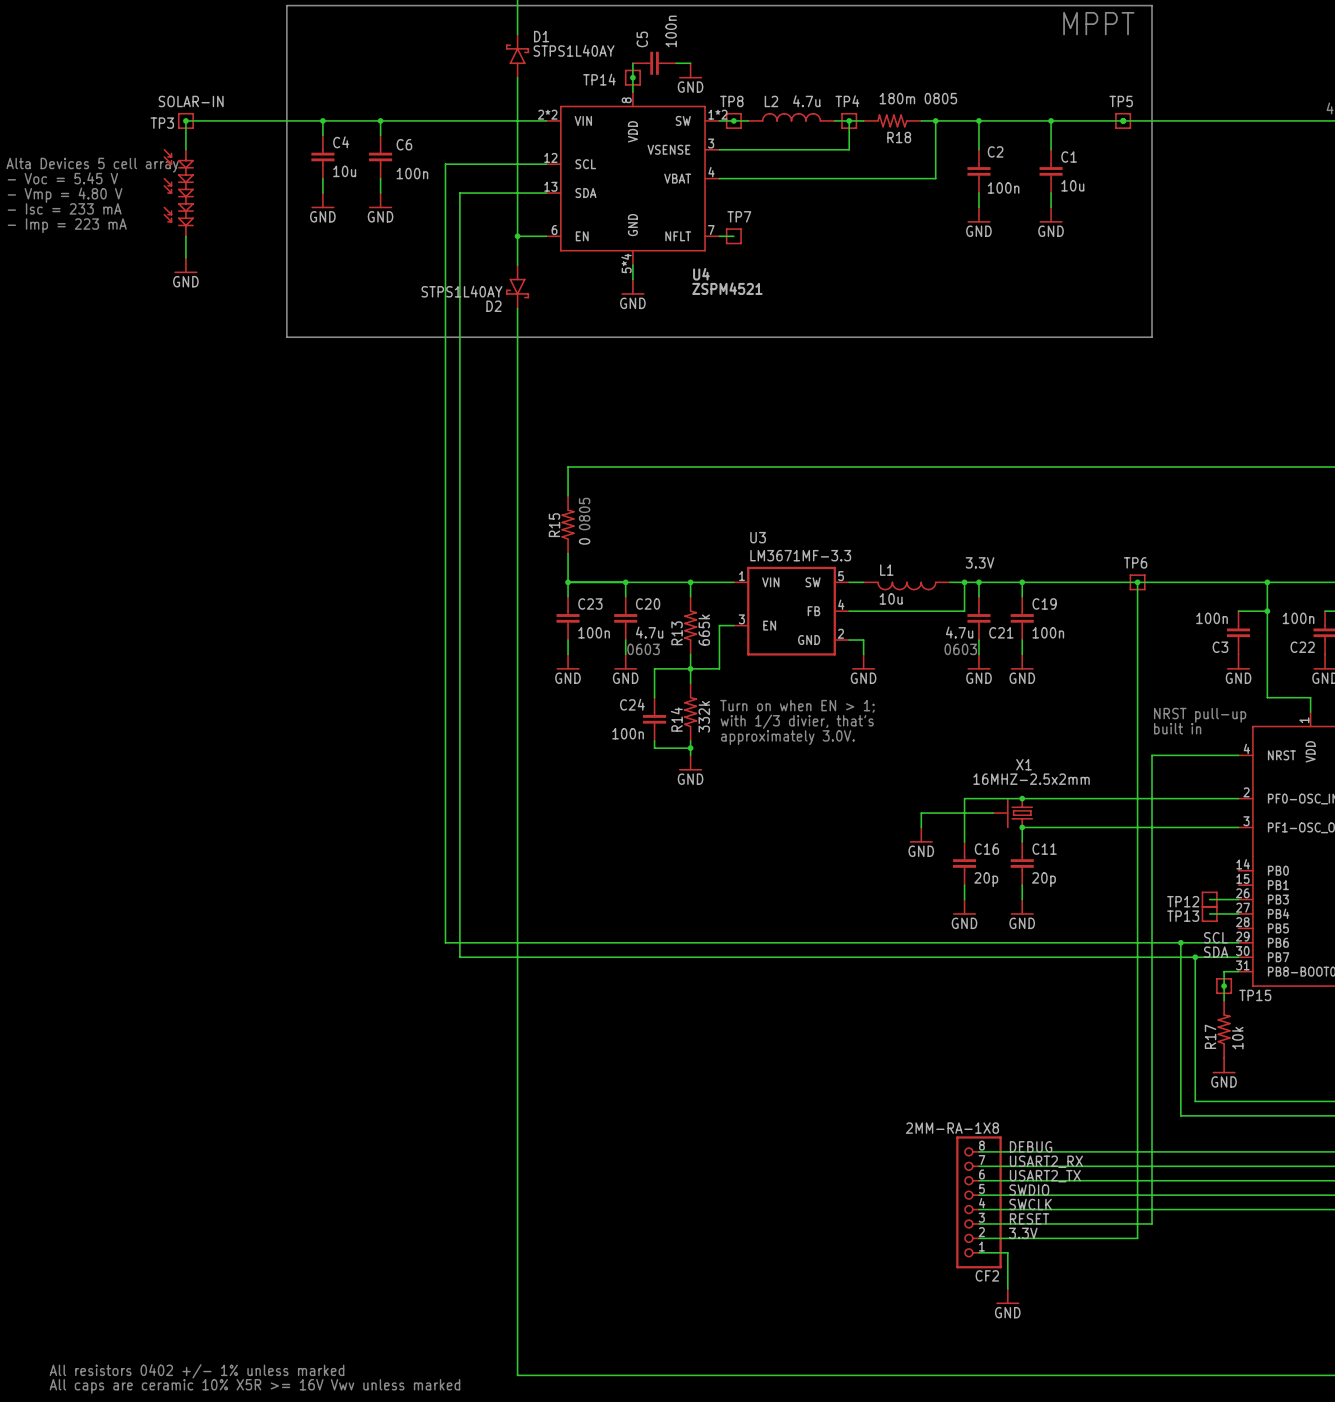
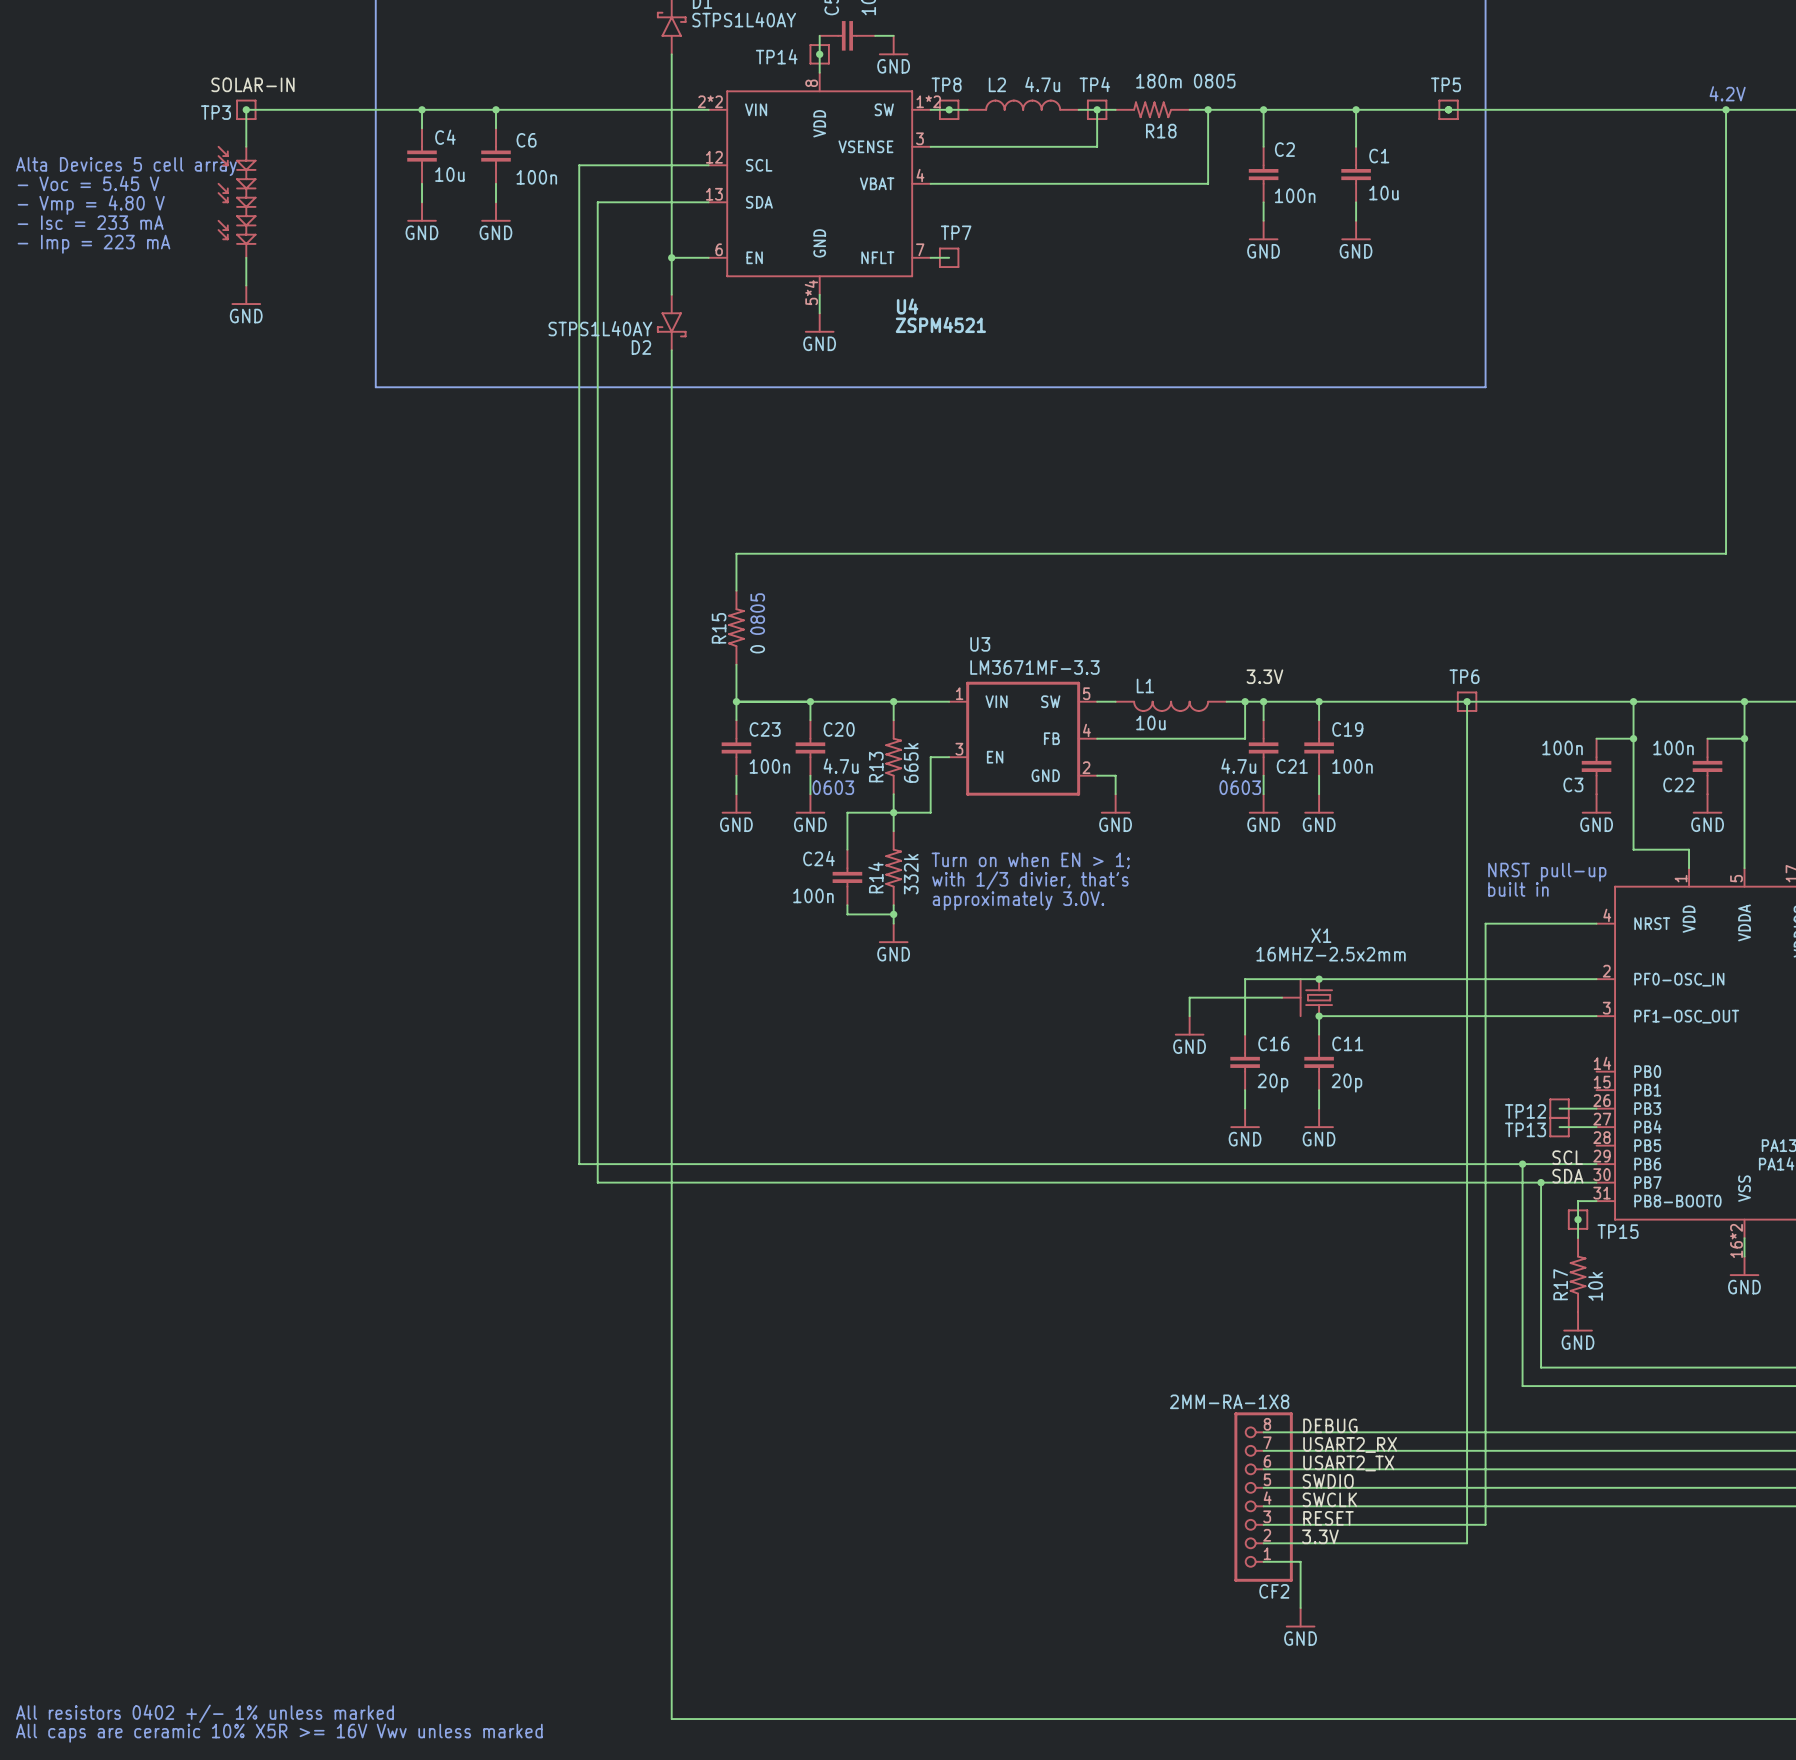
text position: All resistors 0402 +/- 1% unless marked (196, 1371) -> All resistors 0402 +/- 1% unless marked (204, 1713)
text position: All caps are ceramic 10% X5R >= 16V Vwv unless marked (254, 1386) -> All caps are ceramic 10% X5R >= 16V Vwv unless marked (279, 1733)

